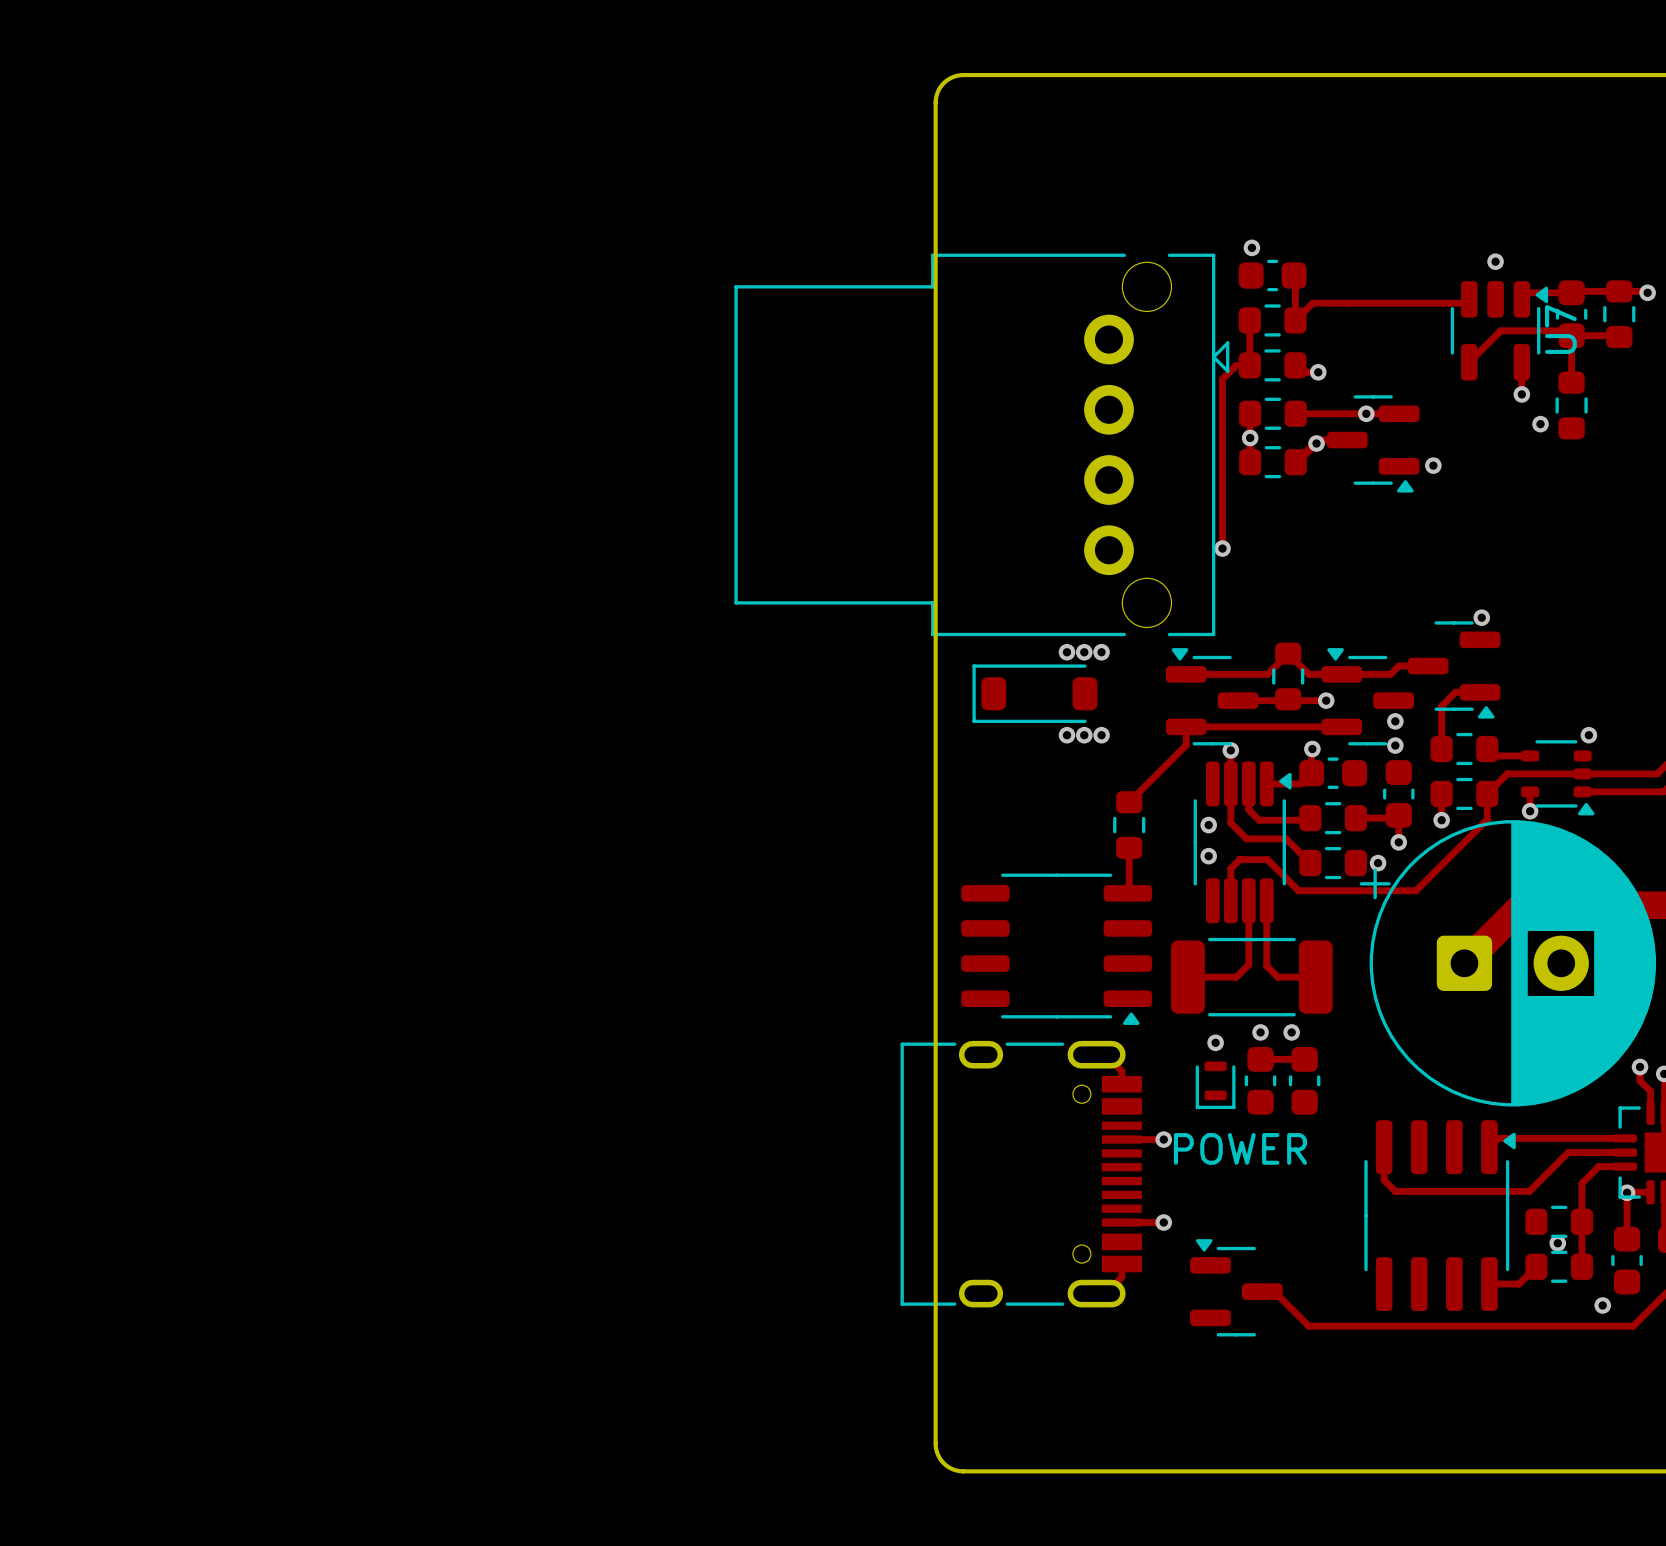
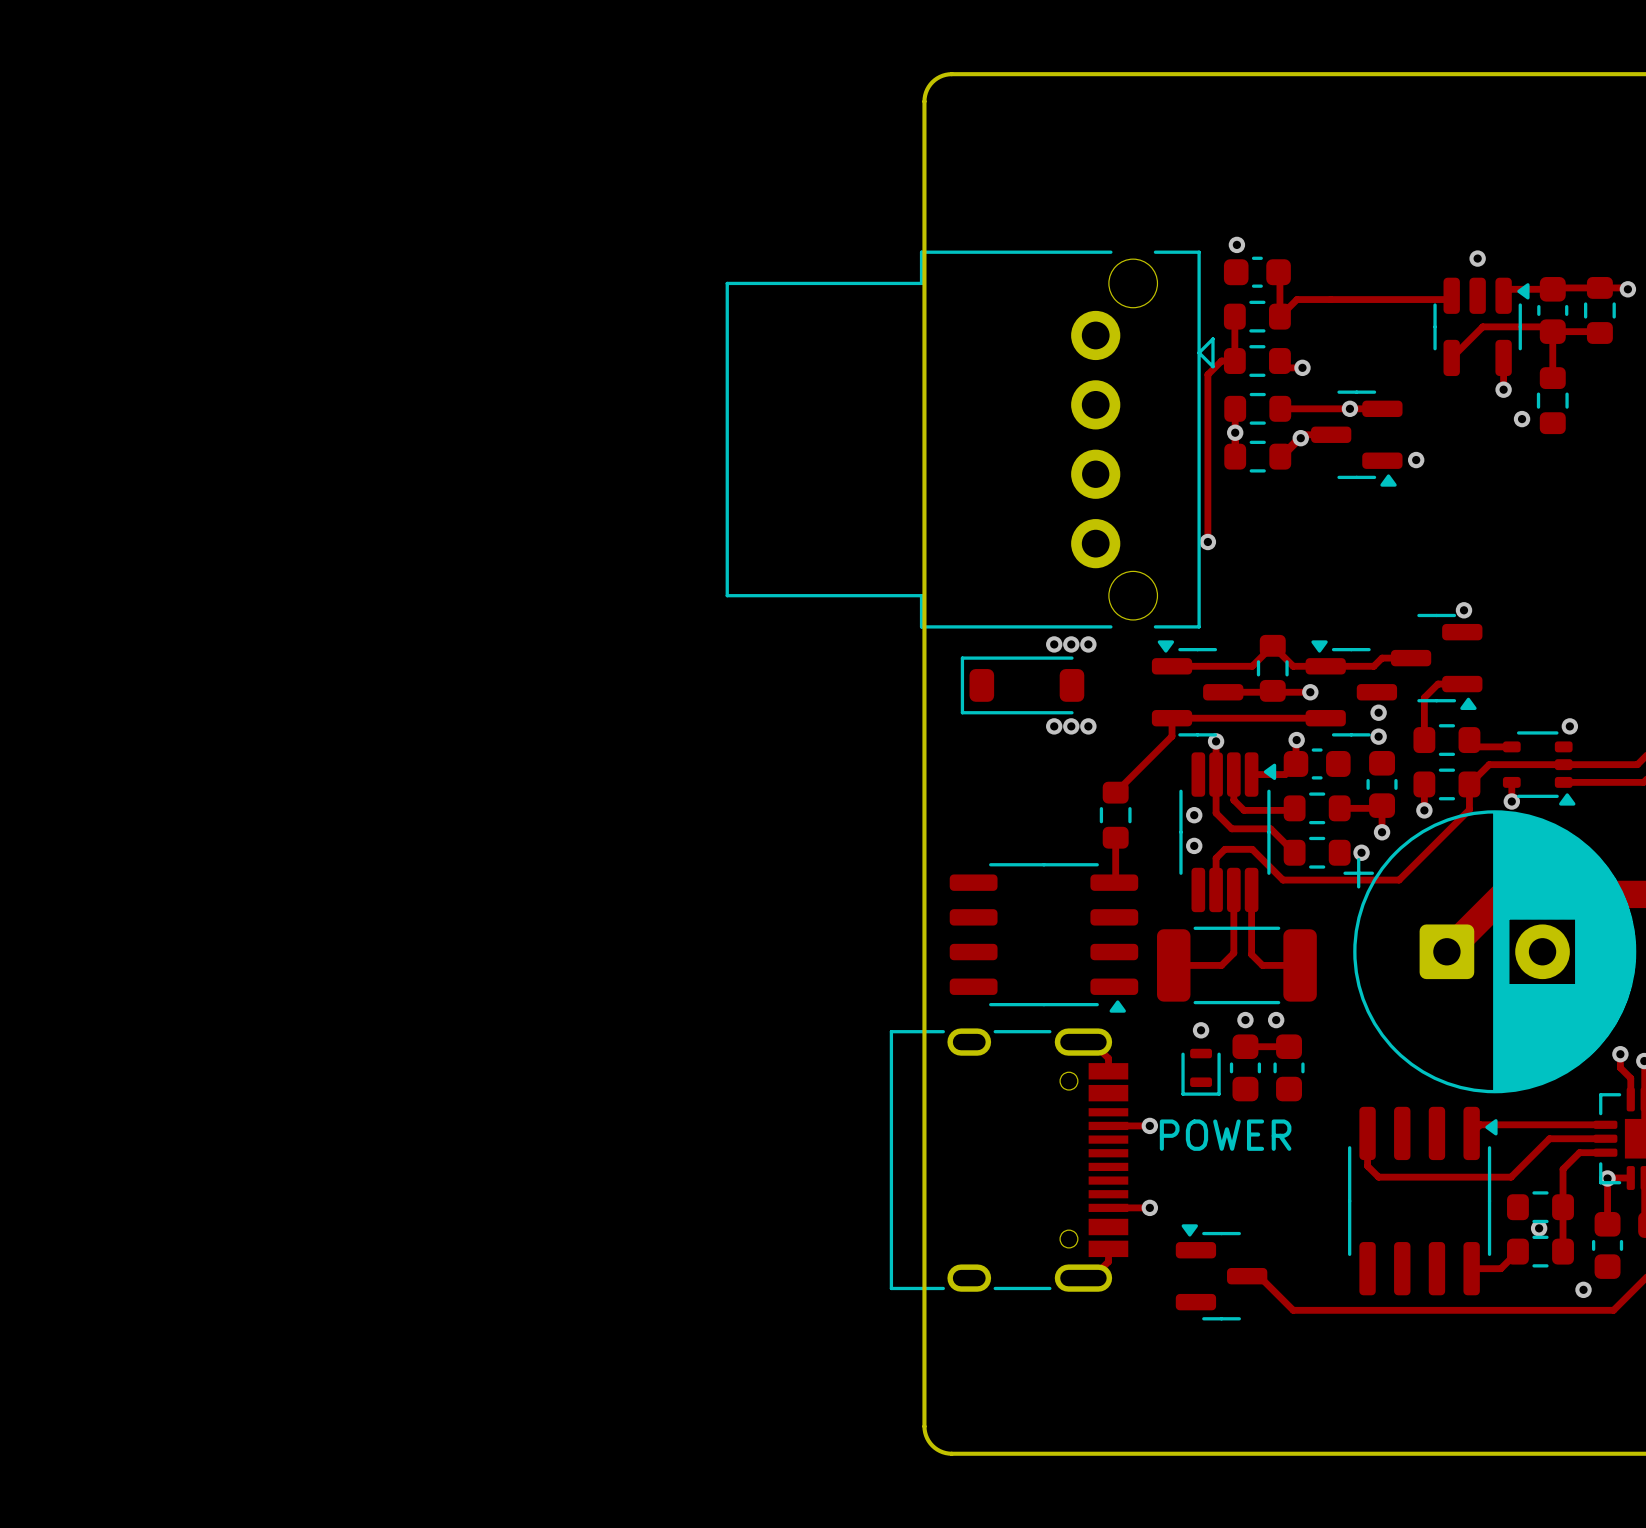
U7 name: U7 (1560, 329) -> none

